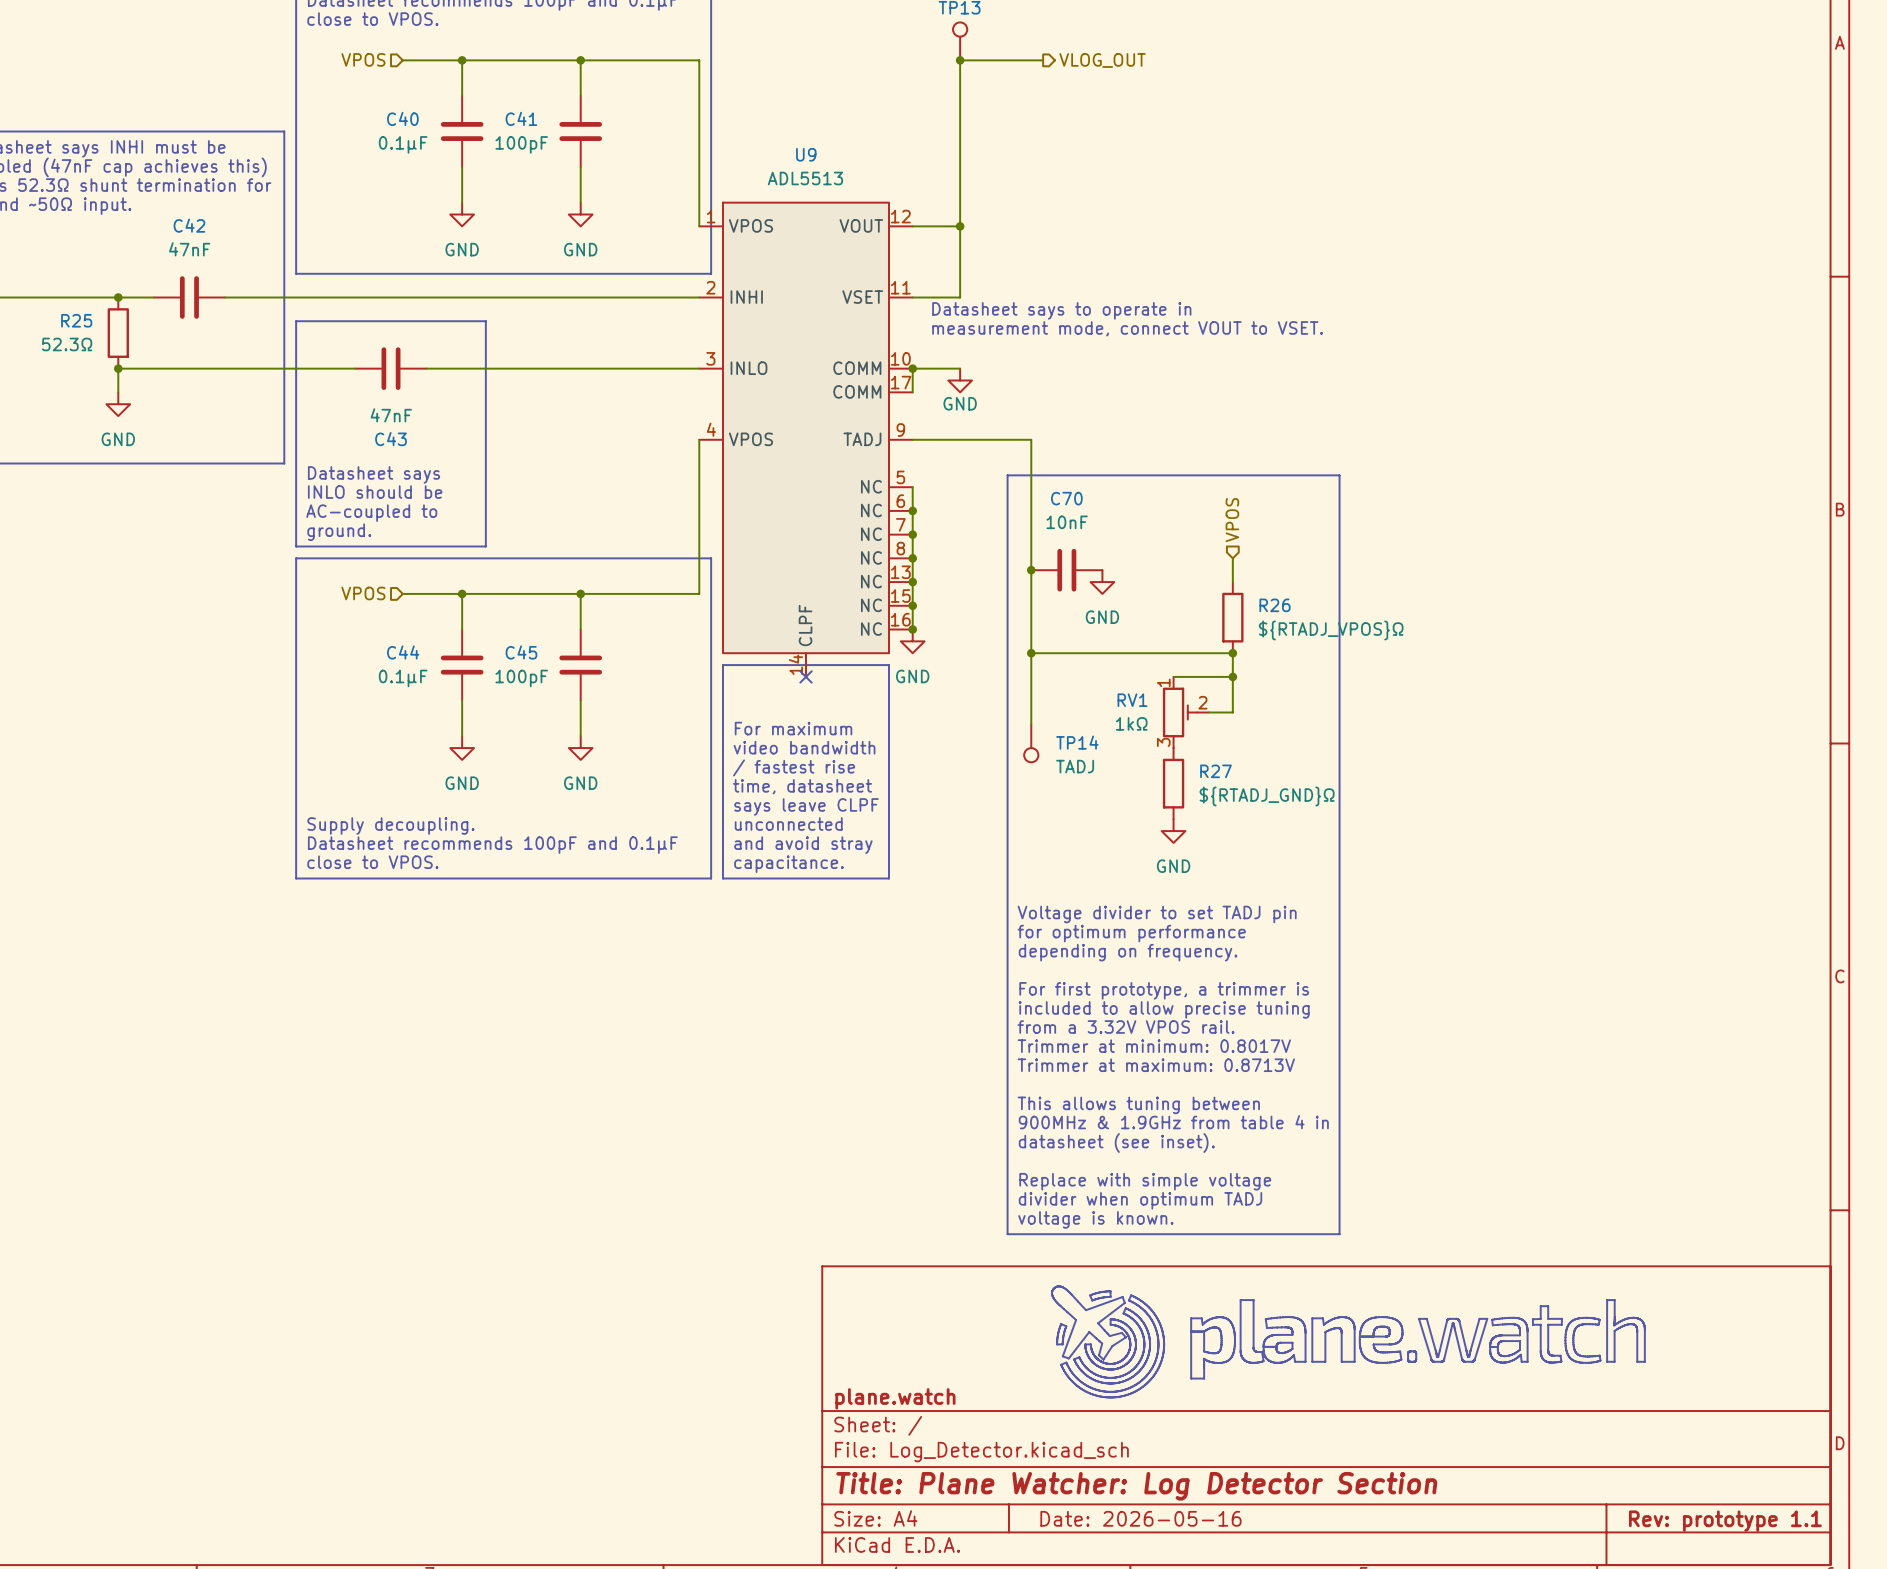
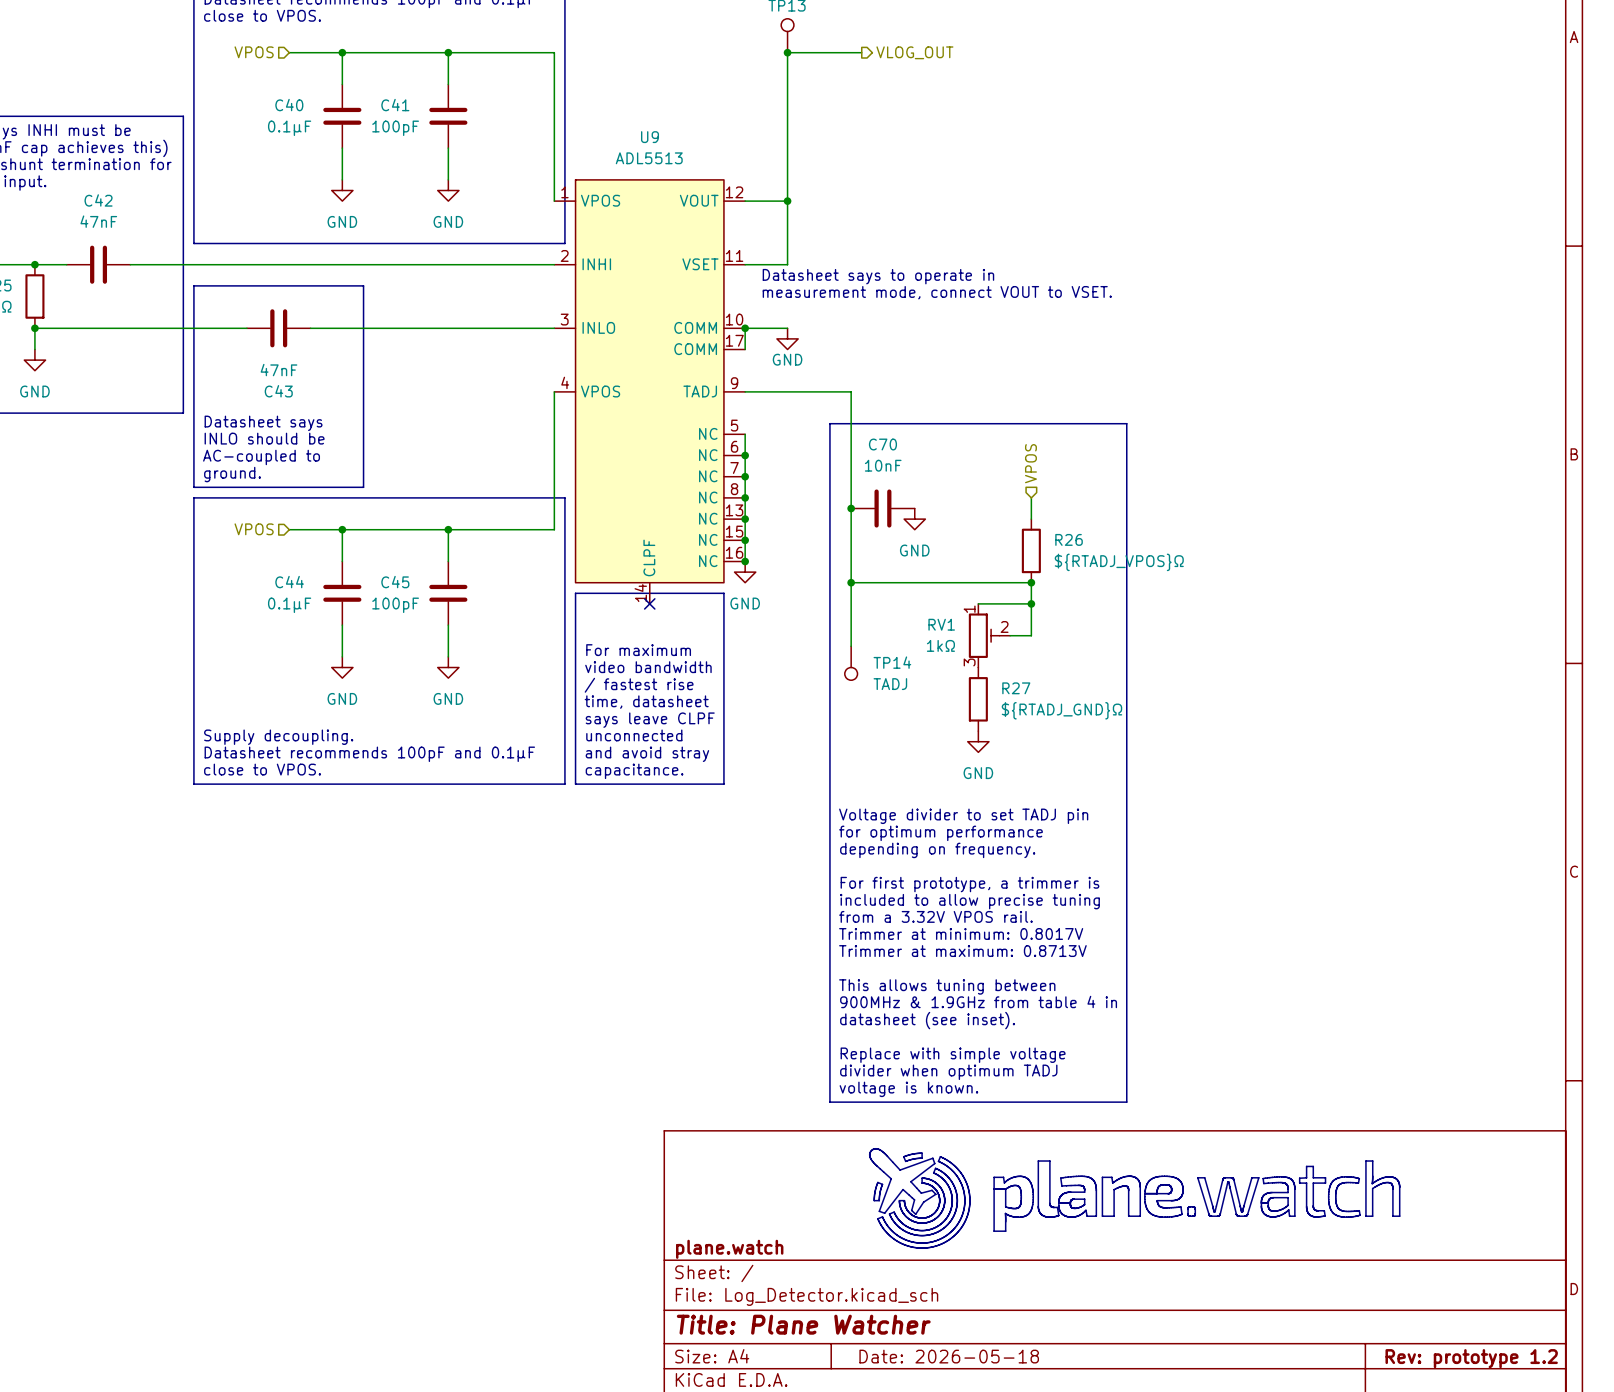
title block: Title: Plane Watcher: Log Detector Section (1136, 1486) -> Title: Plane Watcher (803, 1324)
title block: Date: 2026-05-16 (1140, 1518) -> Date: 2026-05-18 (949, 1356)
title block: Rev: prototype 1.1 (1725, 1521) -> Rev: prototype 1.2 (1471, 1358)

